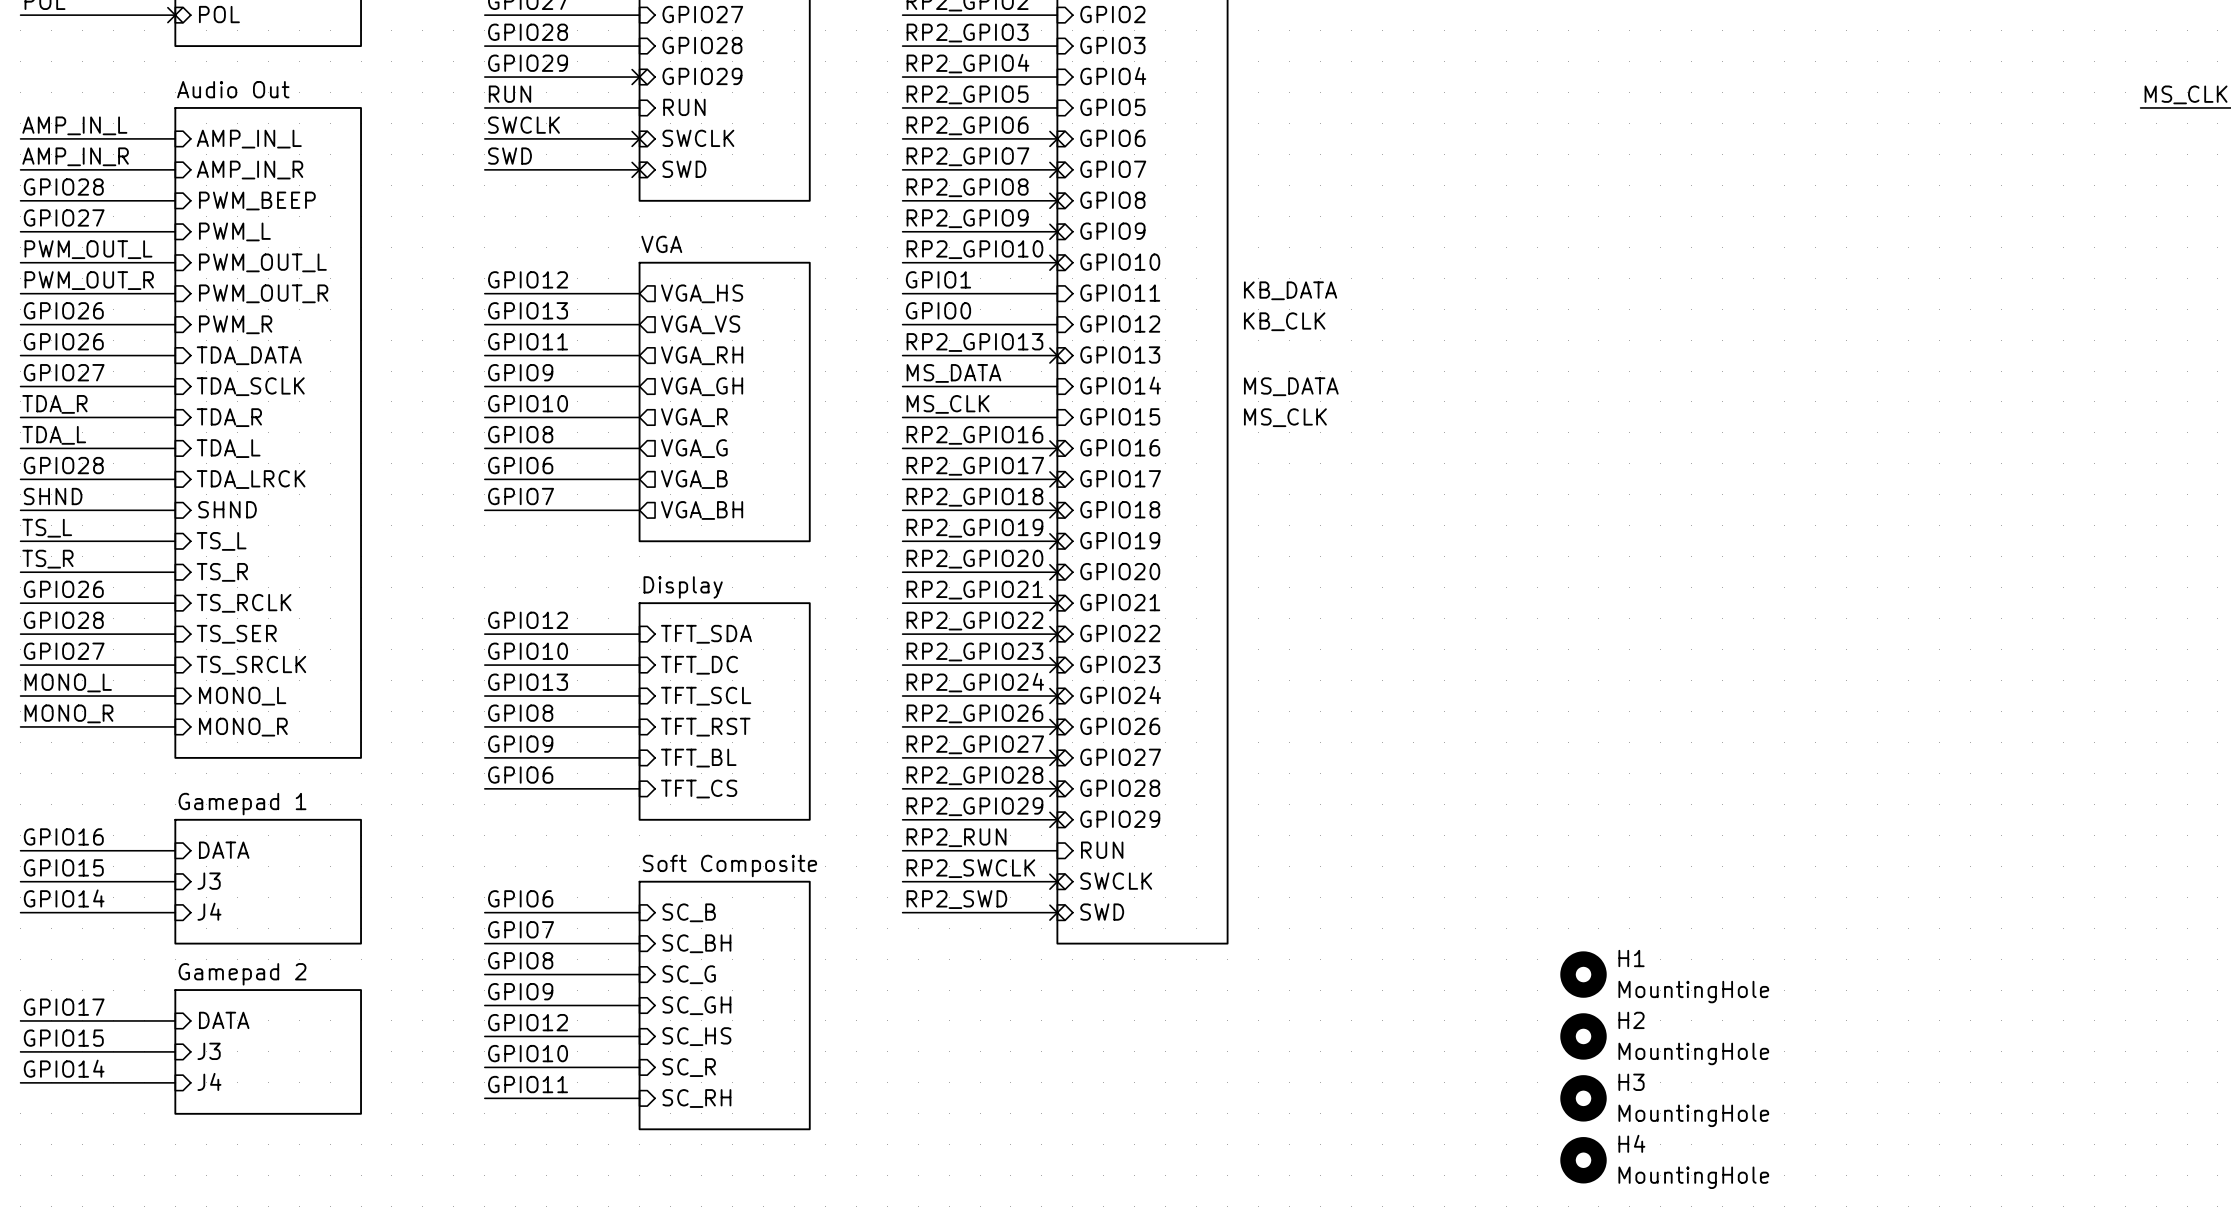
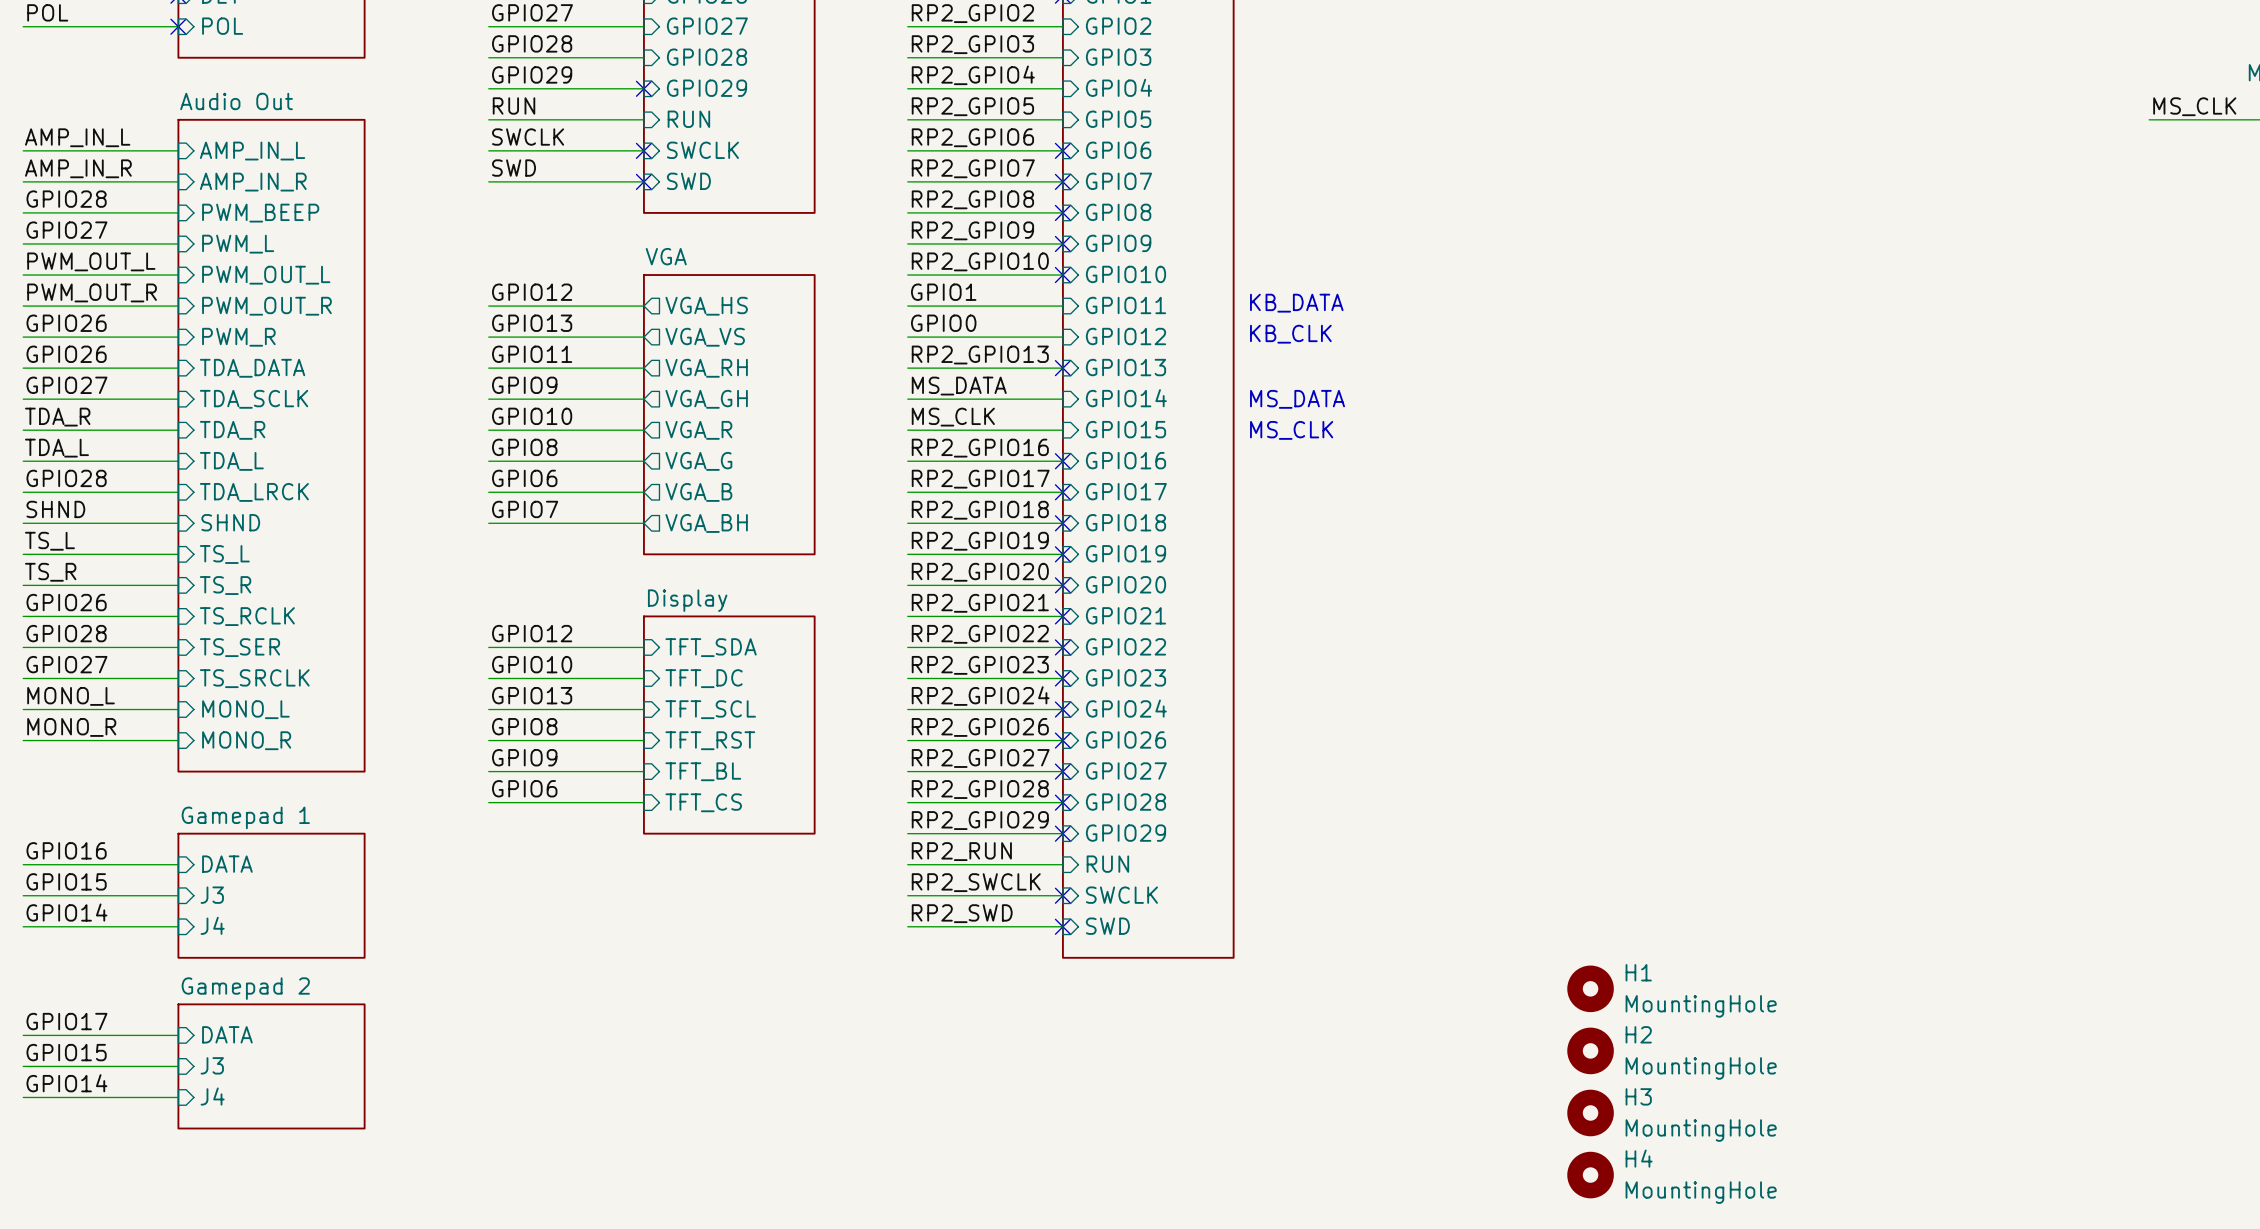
label: GPIO6 (520, 898) -> none
wire: (484, 912) (639, 912) -> none
sheet pin: SC_B (689, 912) -> none
label: GPIO7 (521, 929) -> none
wire: (484, 943) (639, 943) -> none
sheet pin: SC_BH (696, 943) -> none
label: GPIO8 (520, 960) -> none
wire: (484, 974) (639, 974) -> none
sheet pin: SC_G (689, 974) -> none
label: GPIO9 (520, 991) -> none
wire: (484, 1005) (639, 1005) -> none
sheet pin: SC_GH (696, 1005) -> none
sheet Soft Composite: (724, 1005) -> none
label: GPIO12 (528, 1022) -> none
wire: (484, 1036) (639, 1036) -> none
sheet pin: SC_HS (696, 1036) -> none
label: GPIO10 (528, 1053) -> none
wire: (484, 1067) (639, 1067) -> none
sheet pin: SC_R (689, 1067) -> none
label: GPIO11 (528, 1084) -> none
wire: (484, 1098) (639, 1098) -> none
sheet pin: SC_RH (696, 1098) -> none

